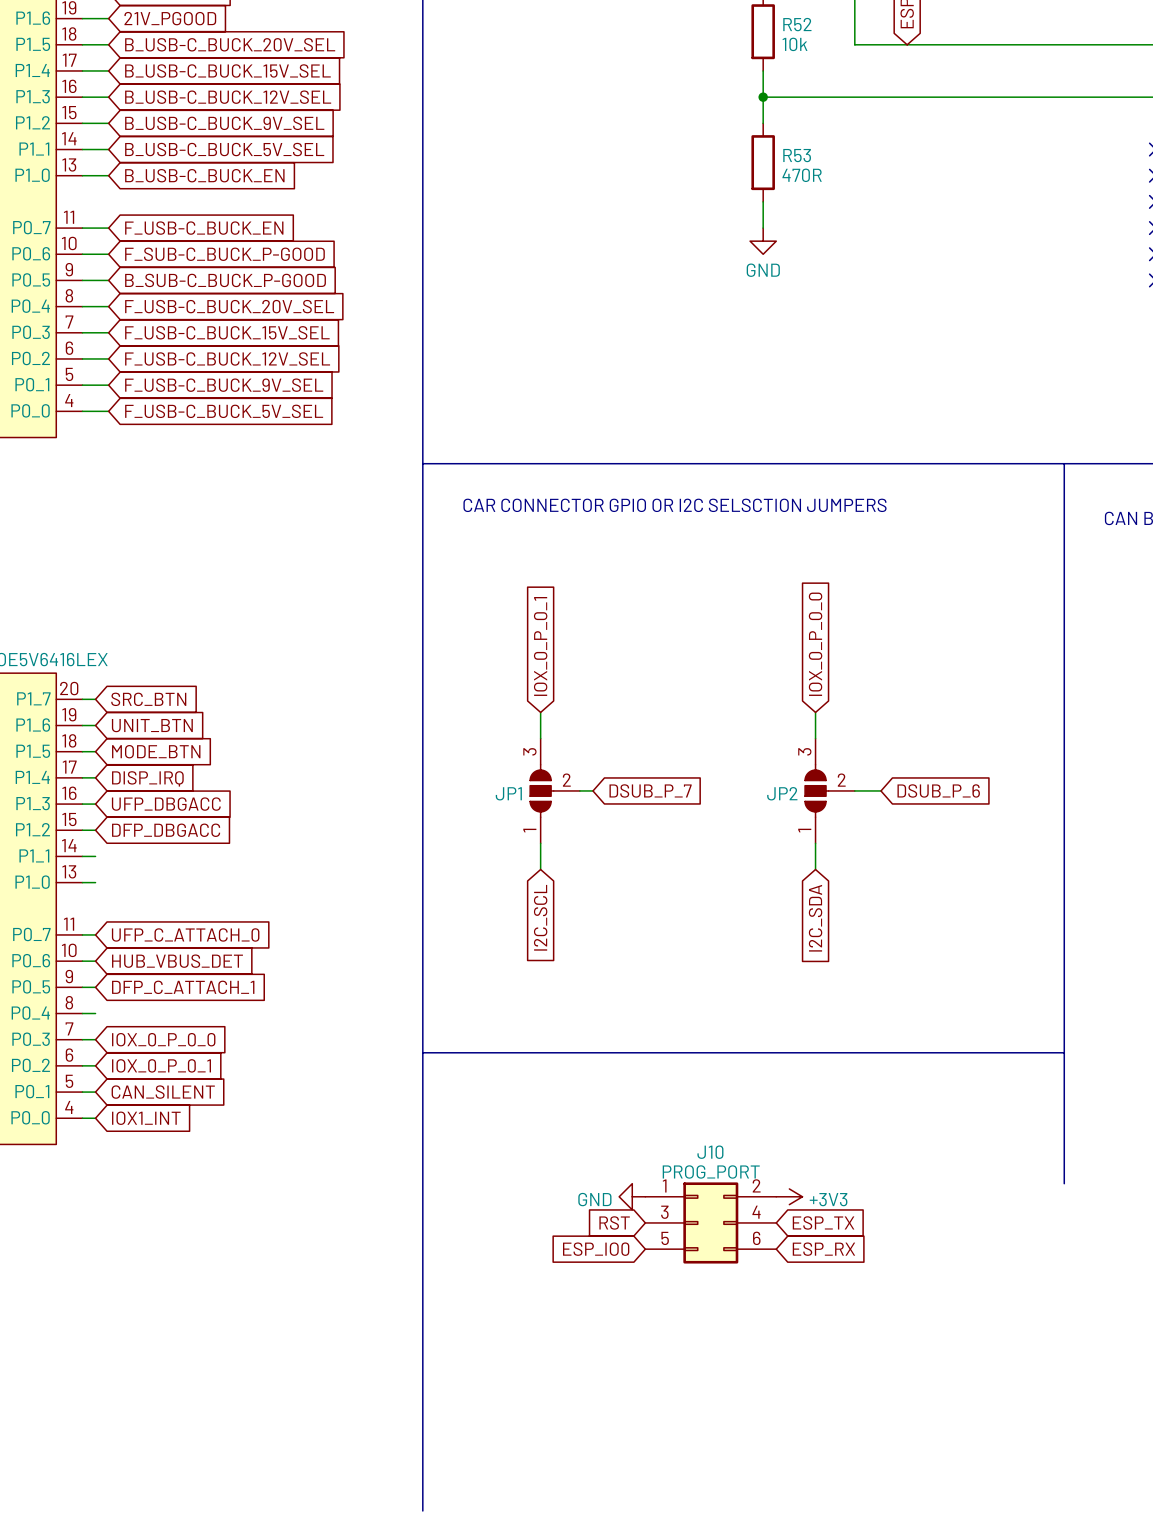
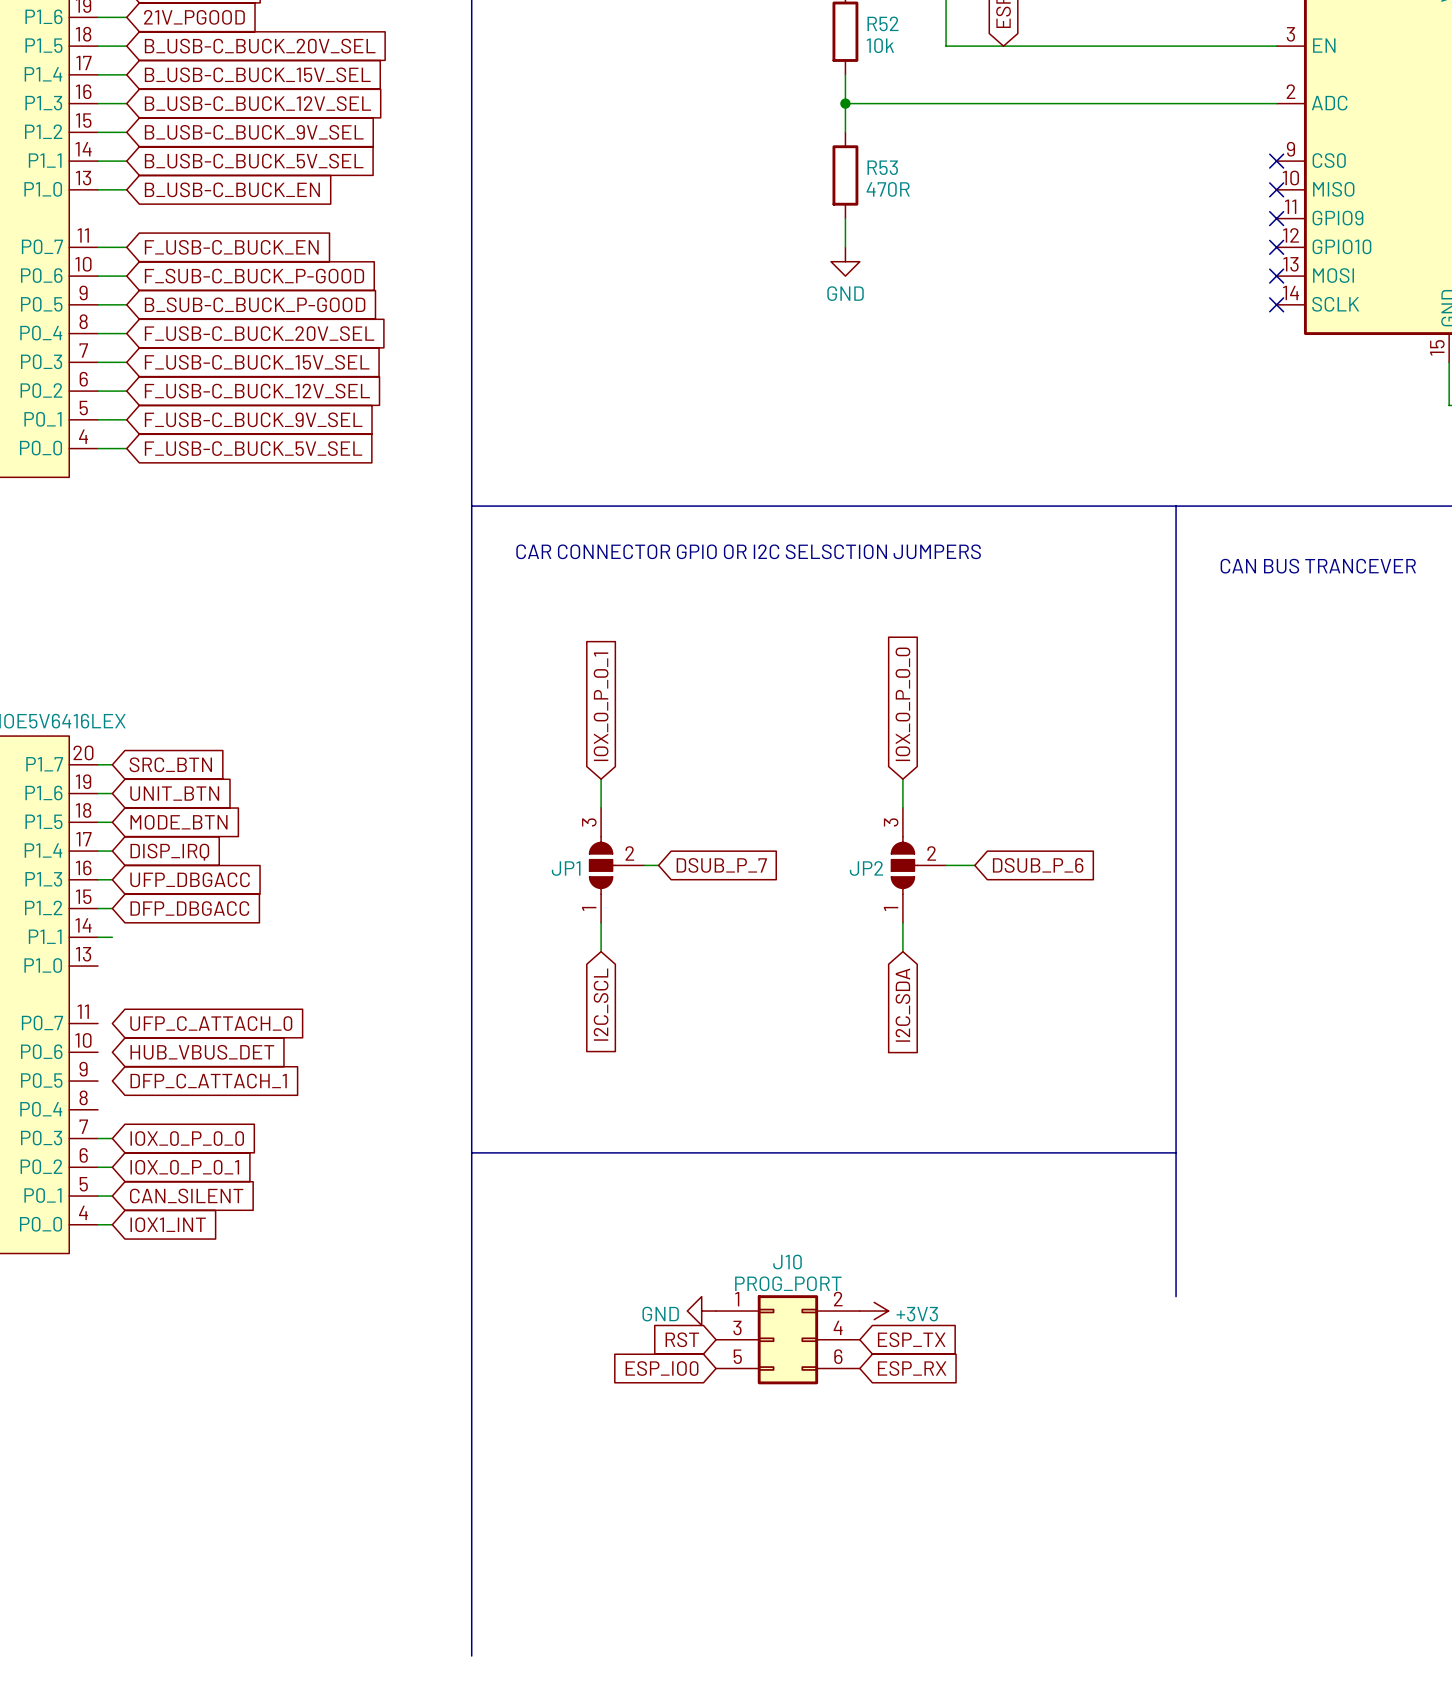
wire: (82, 882) (95, 882) -> none
wire: (82, 934) (95, 934) -> none
wire: (82, 961) (95, 961) -> none
wire: (82, 987) (95, 987) -> none
wire: (82, 1013) (95, 1013) -> none

